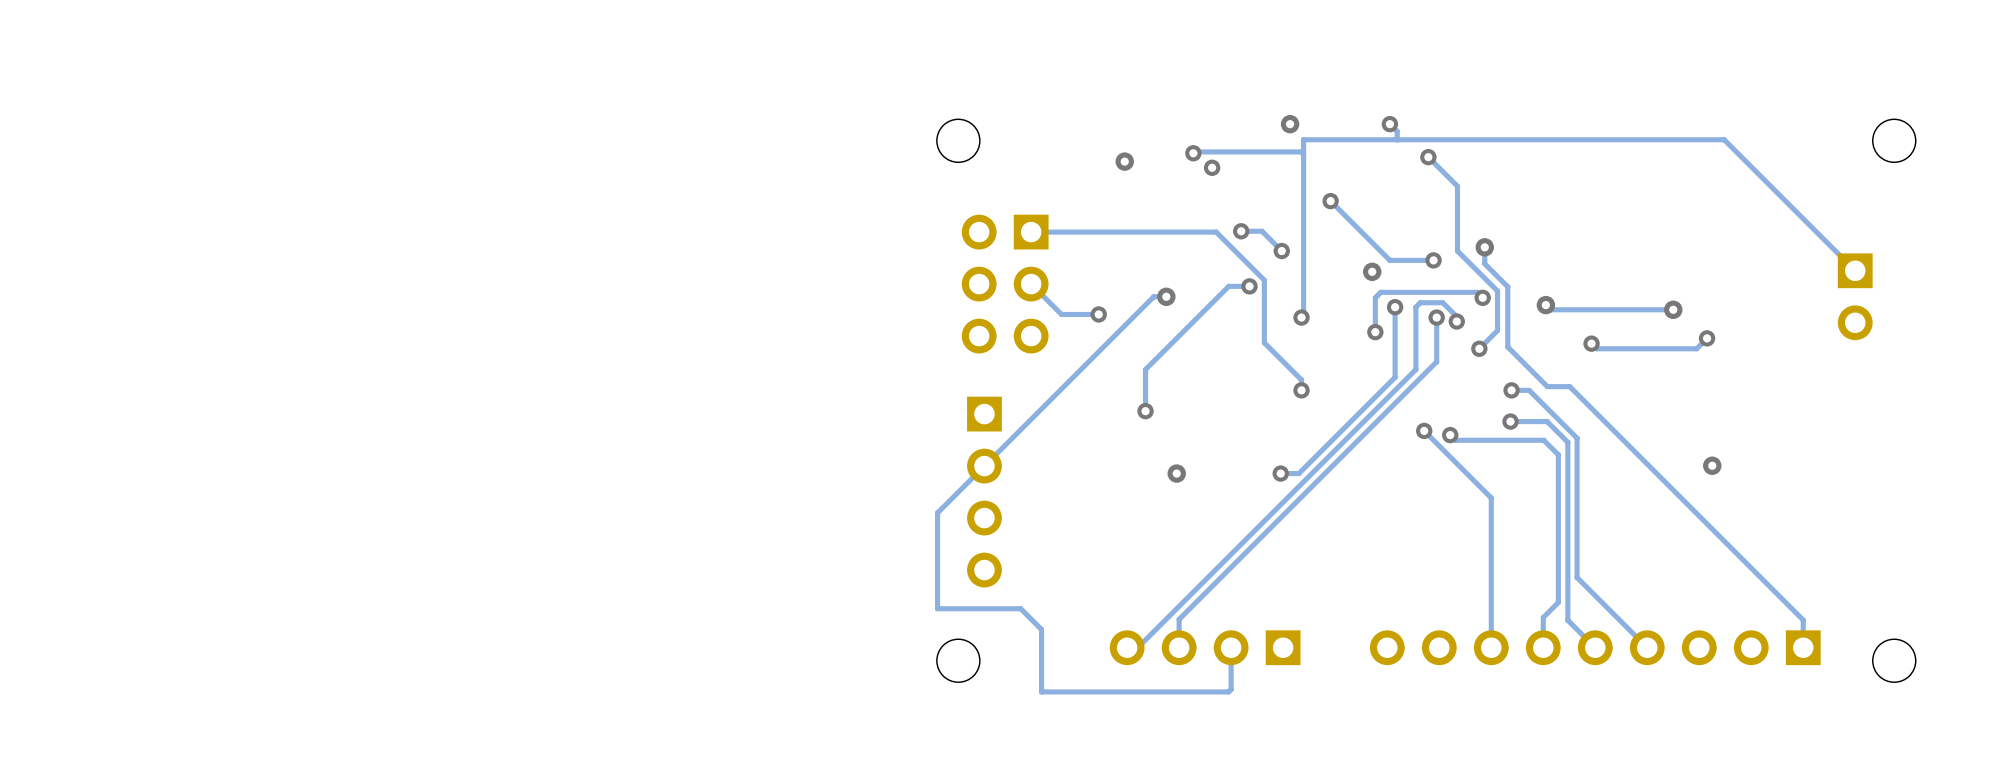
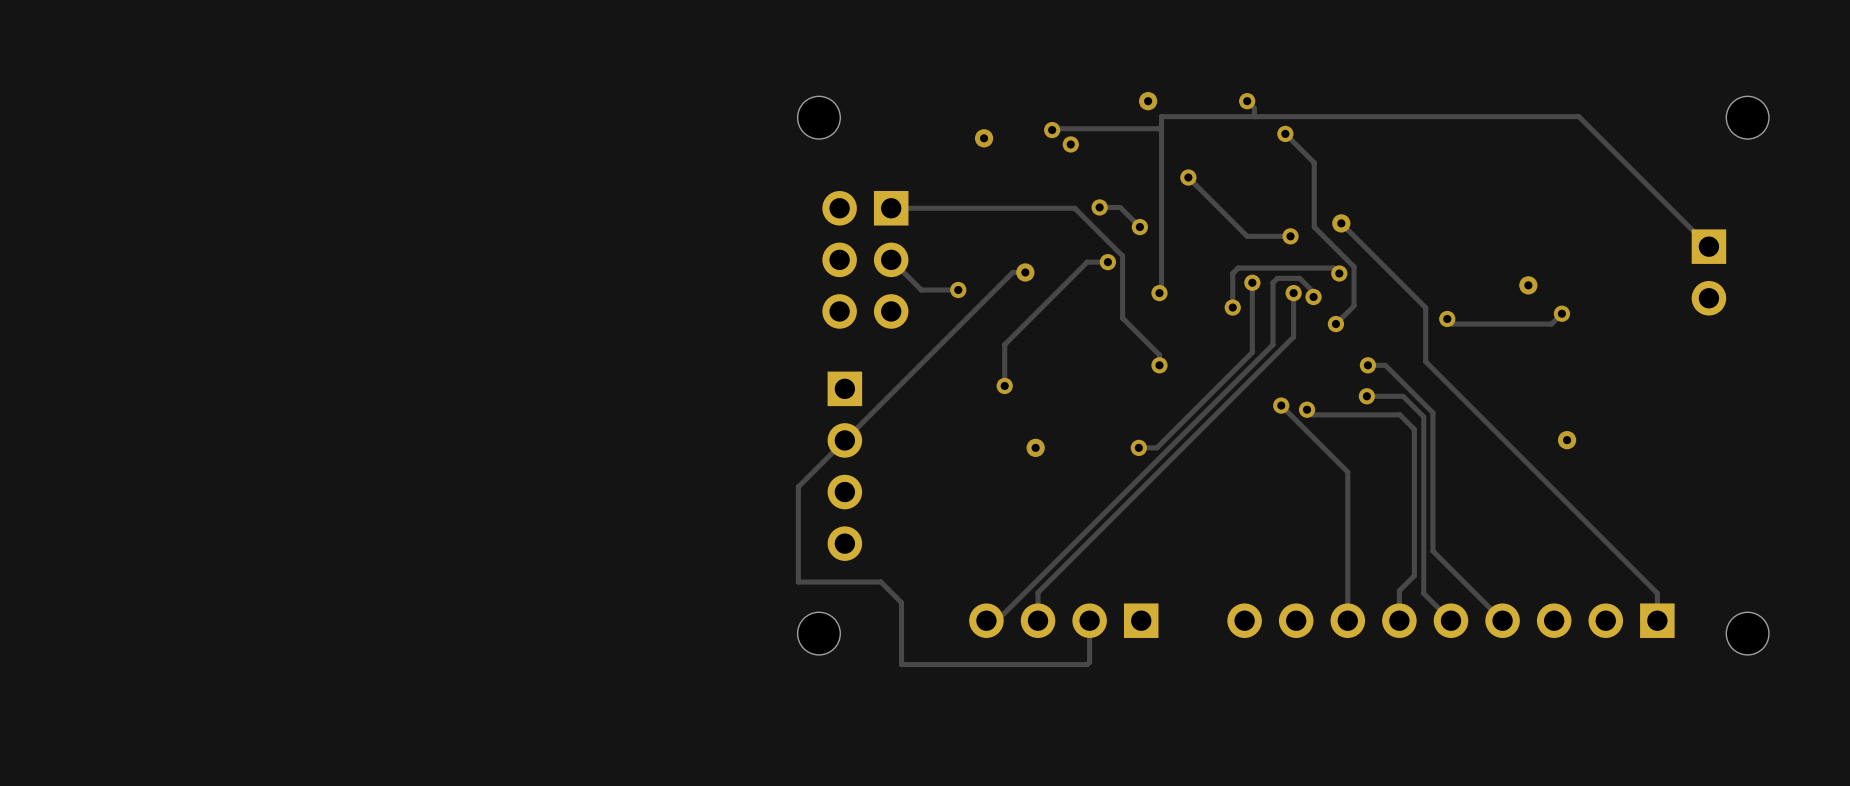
track: (1484, 247) (1484, 263) (1507, 286) (1507, 347) (1547, 386) (1569, 386) -> (1341, 223) (1425, 307) (1425, 361)
via: (1372, 271) -> none
track: (1545, 305) (1550, 309) (1673, 309) -> none
via: (1545, 305) -> none

